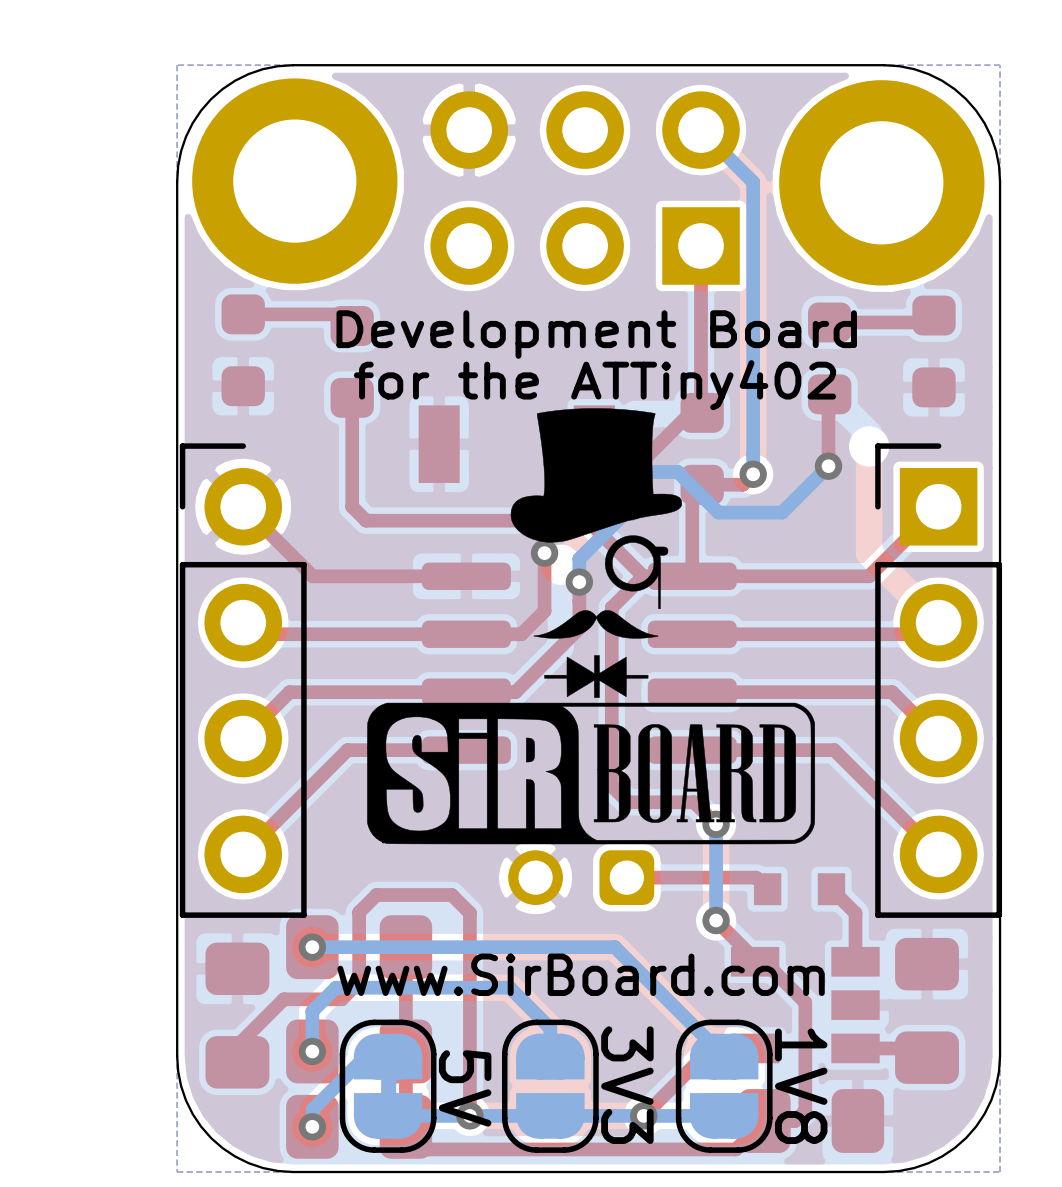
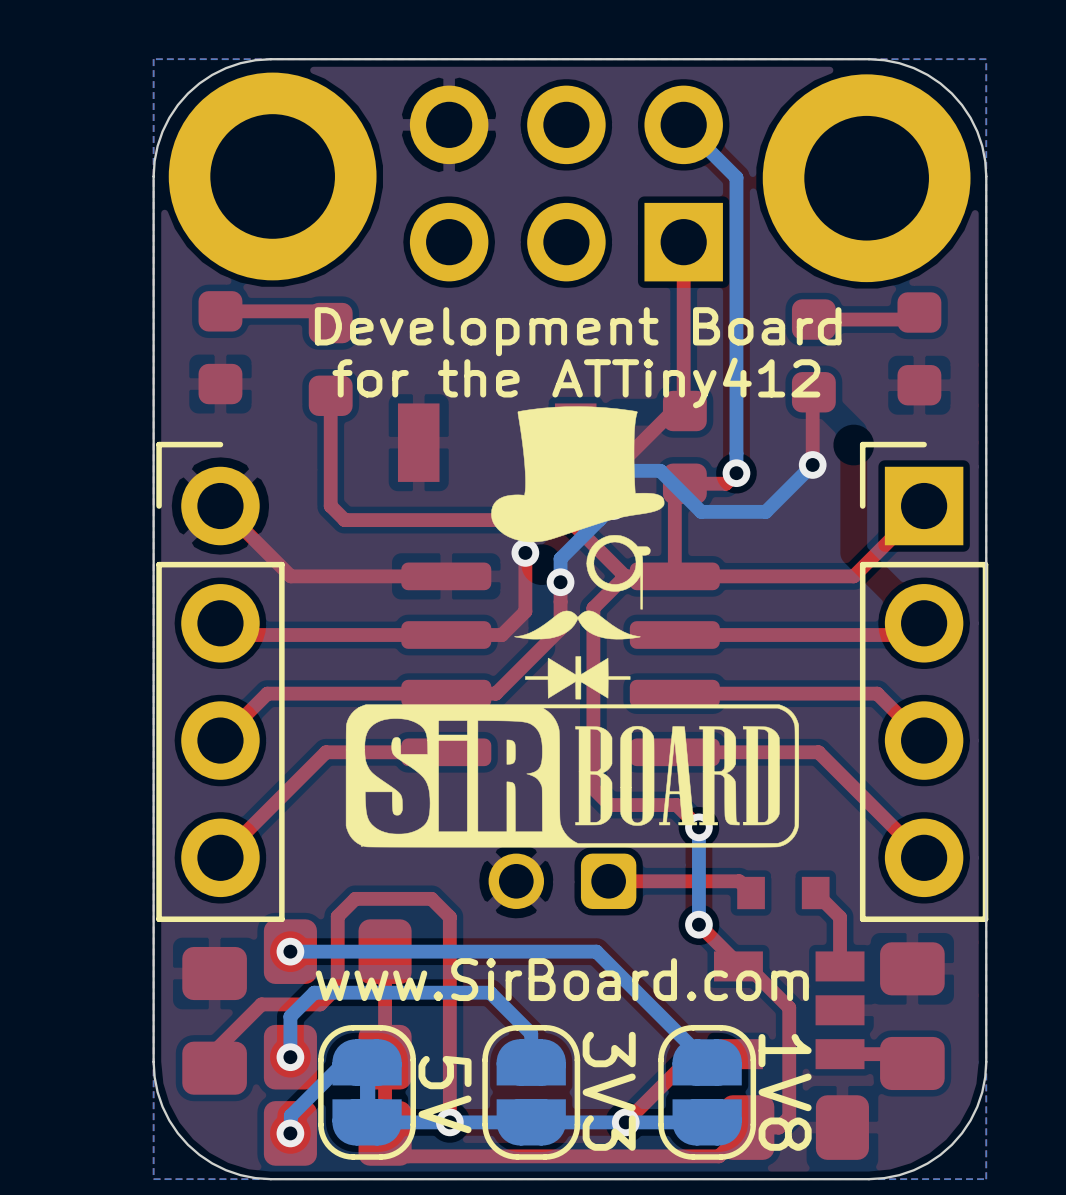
text: for the ATTiny402 (594, 385) -> for the ATTiny412 (576, 382)

